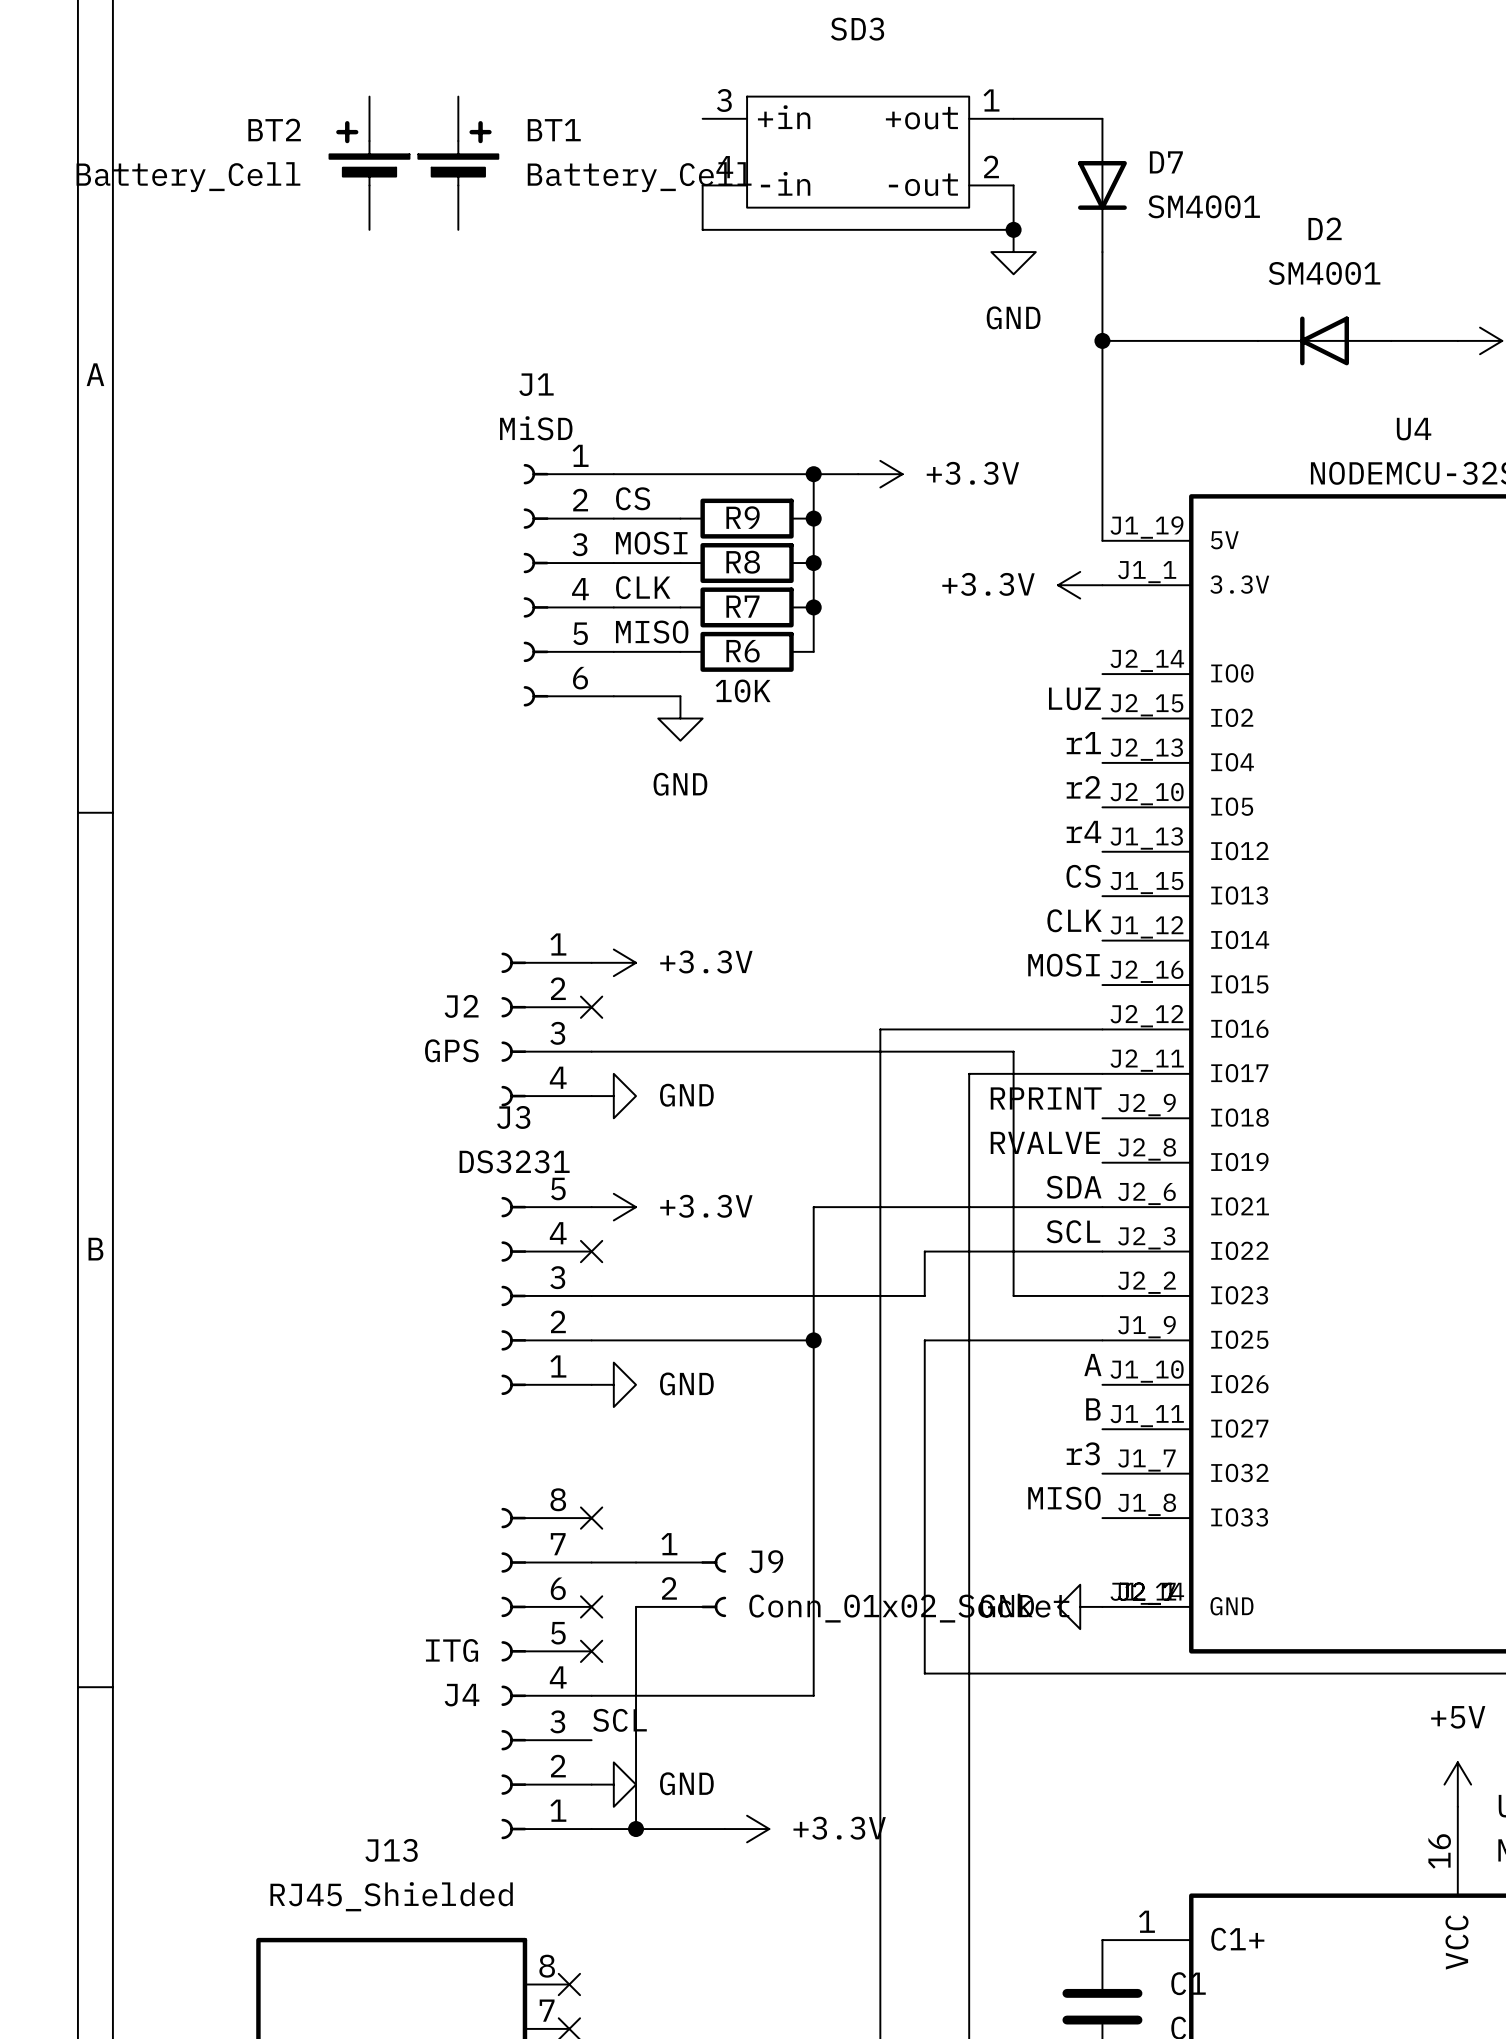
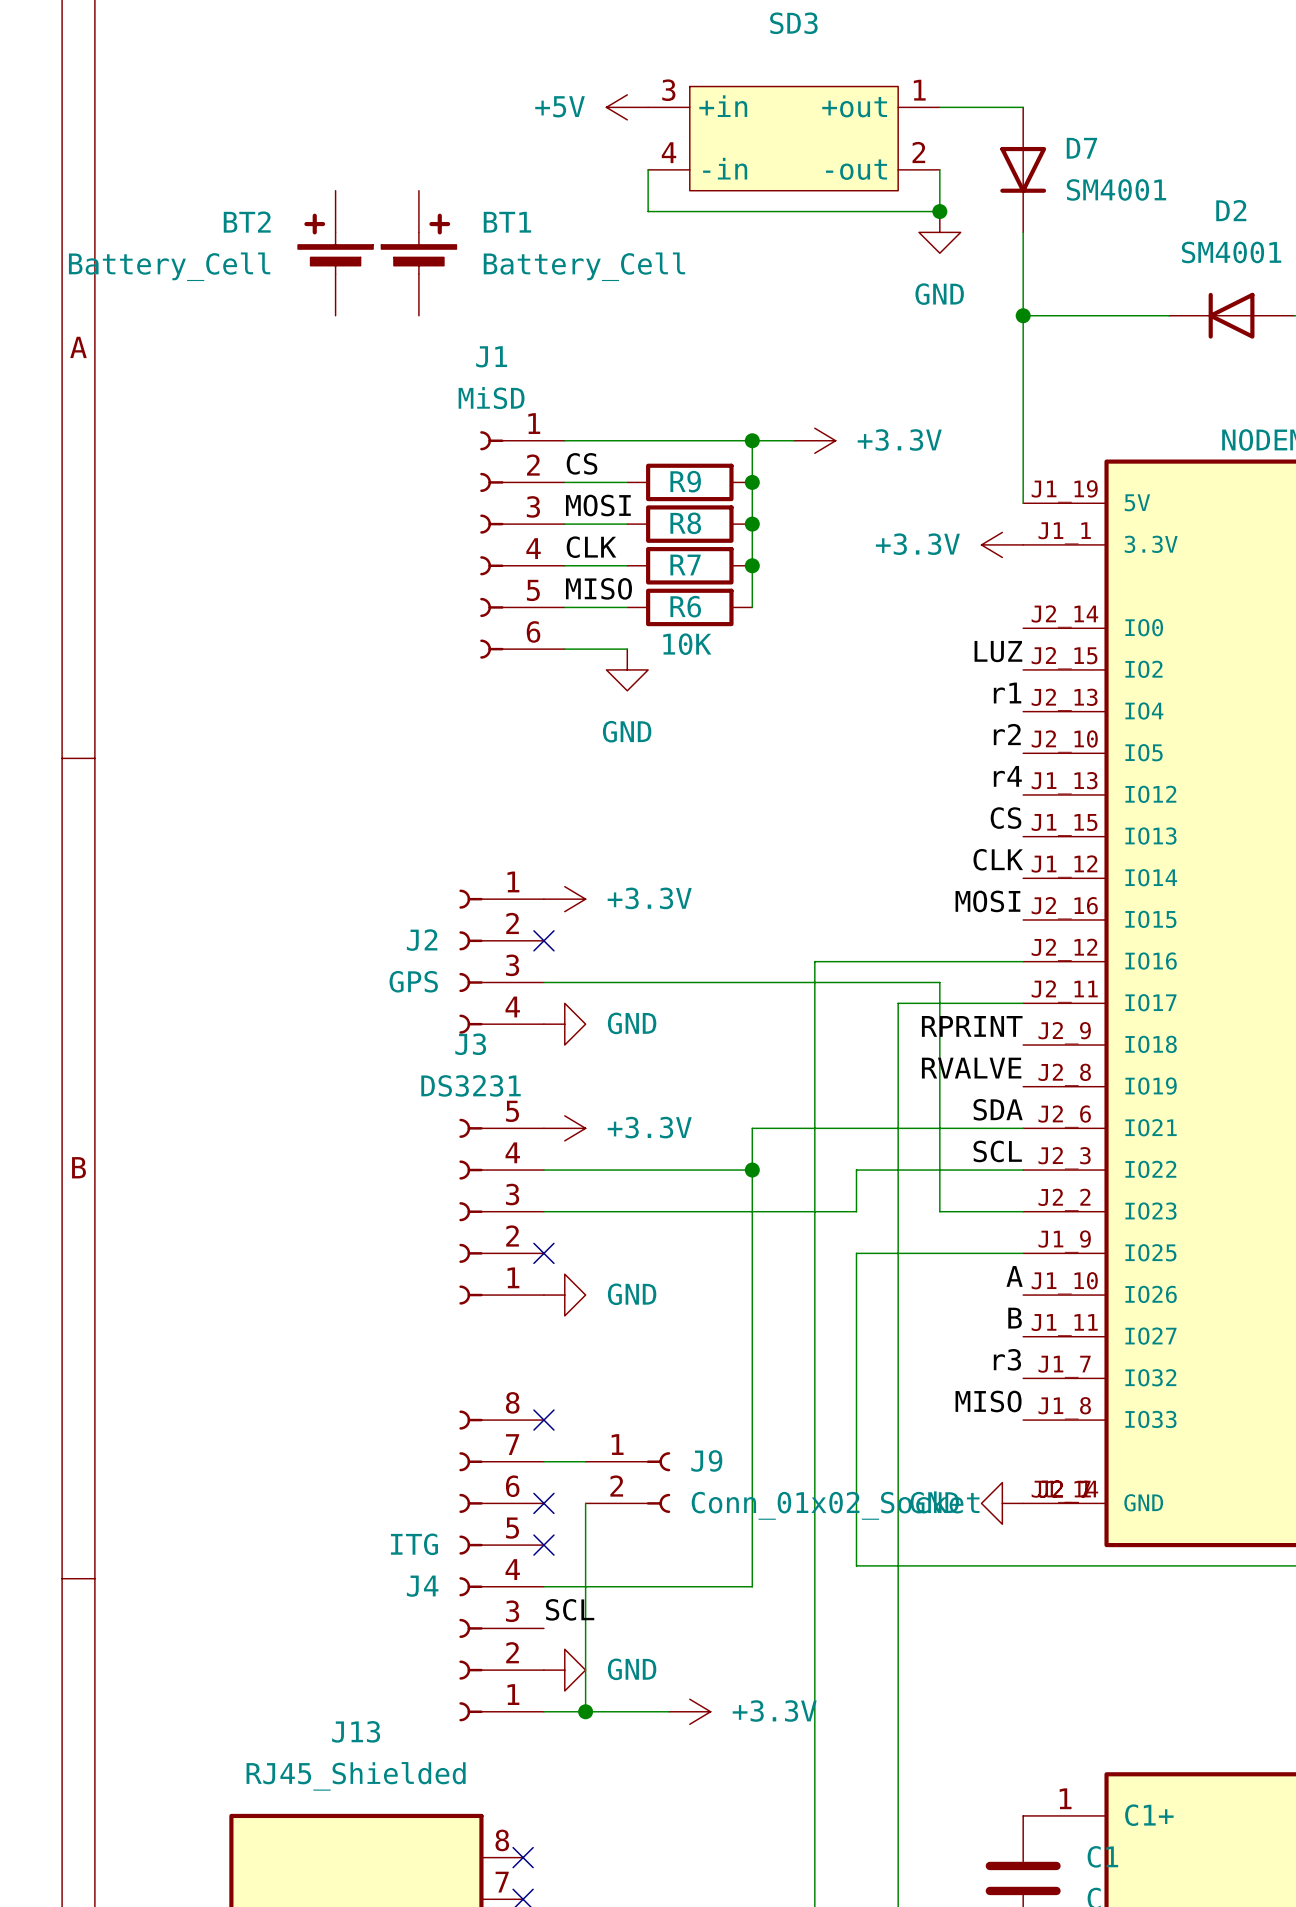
power symbol: none -> +5V (627, 107)
BT2 position: (369, 163) -> (335, 253)
BT1 position: (458, 163) -> (418, 253)
no-connect mark position: (591, 1251) -> (543, 1253)
wire: (591, 1340) (813, 1340) -> (543, 1170) (752, 1170)
junction position: (813, 1340) -> (752, 1170)

